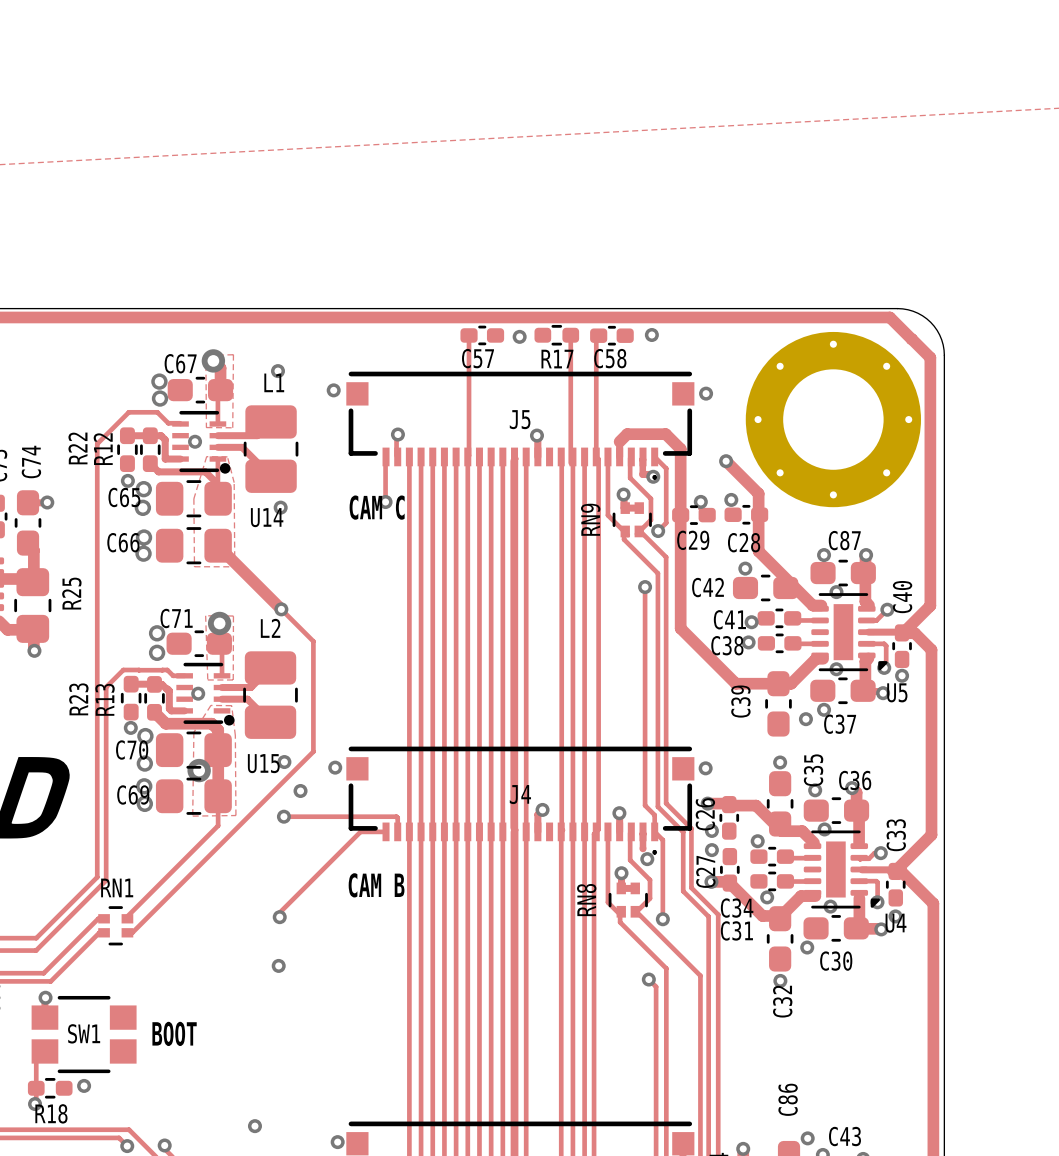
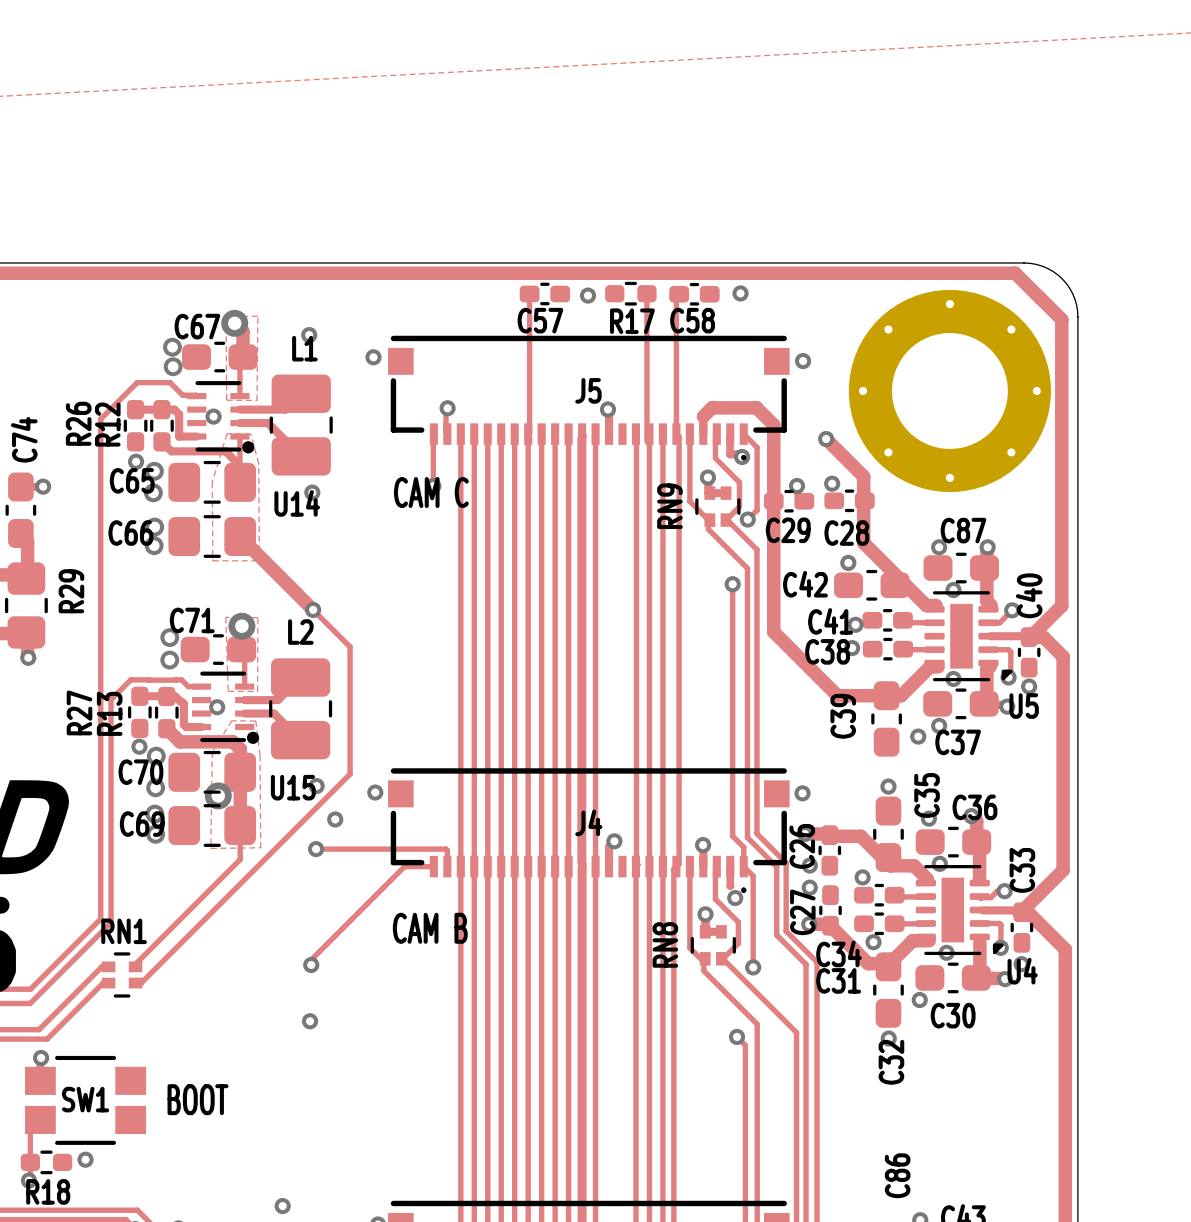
R22 name: R22 (77, 448) -> R26 (78, 423)
R25 name: R25 (71, 593) -> R29 (71, 591)
R23 name: R23 (78, 699) -> R27 (79, 712)

